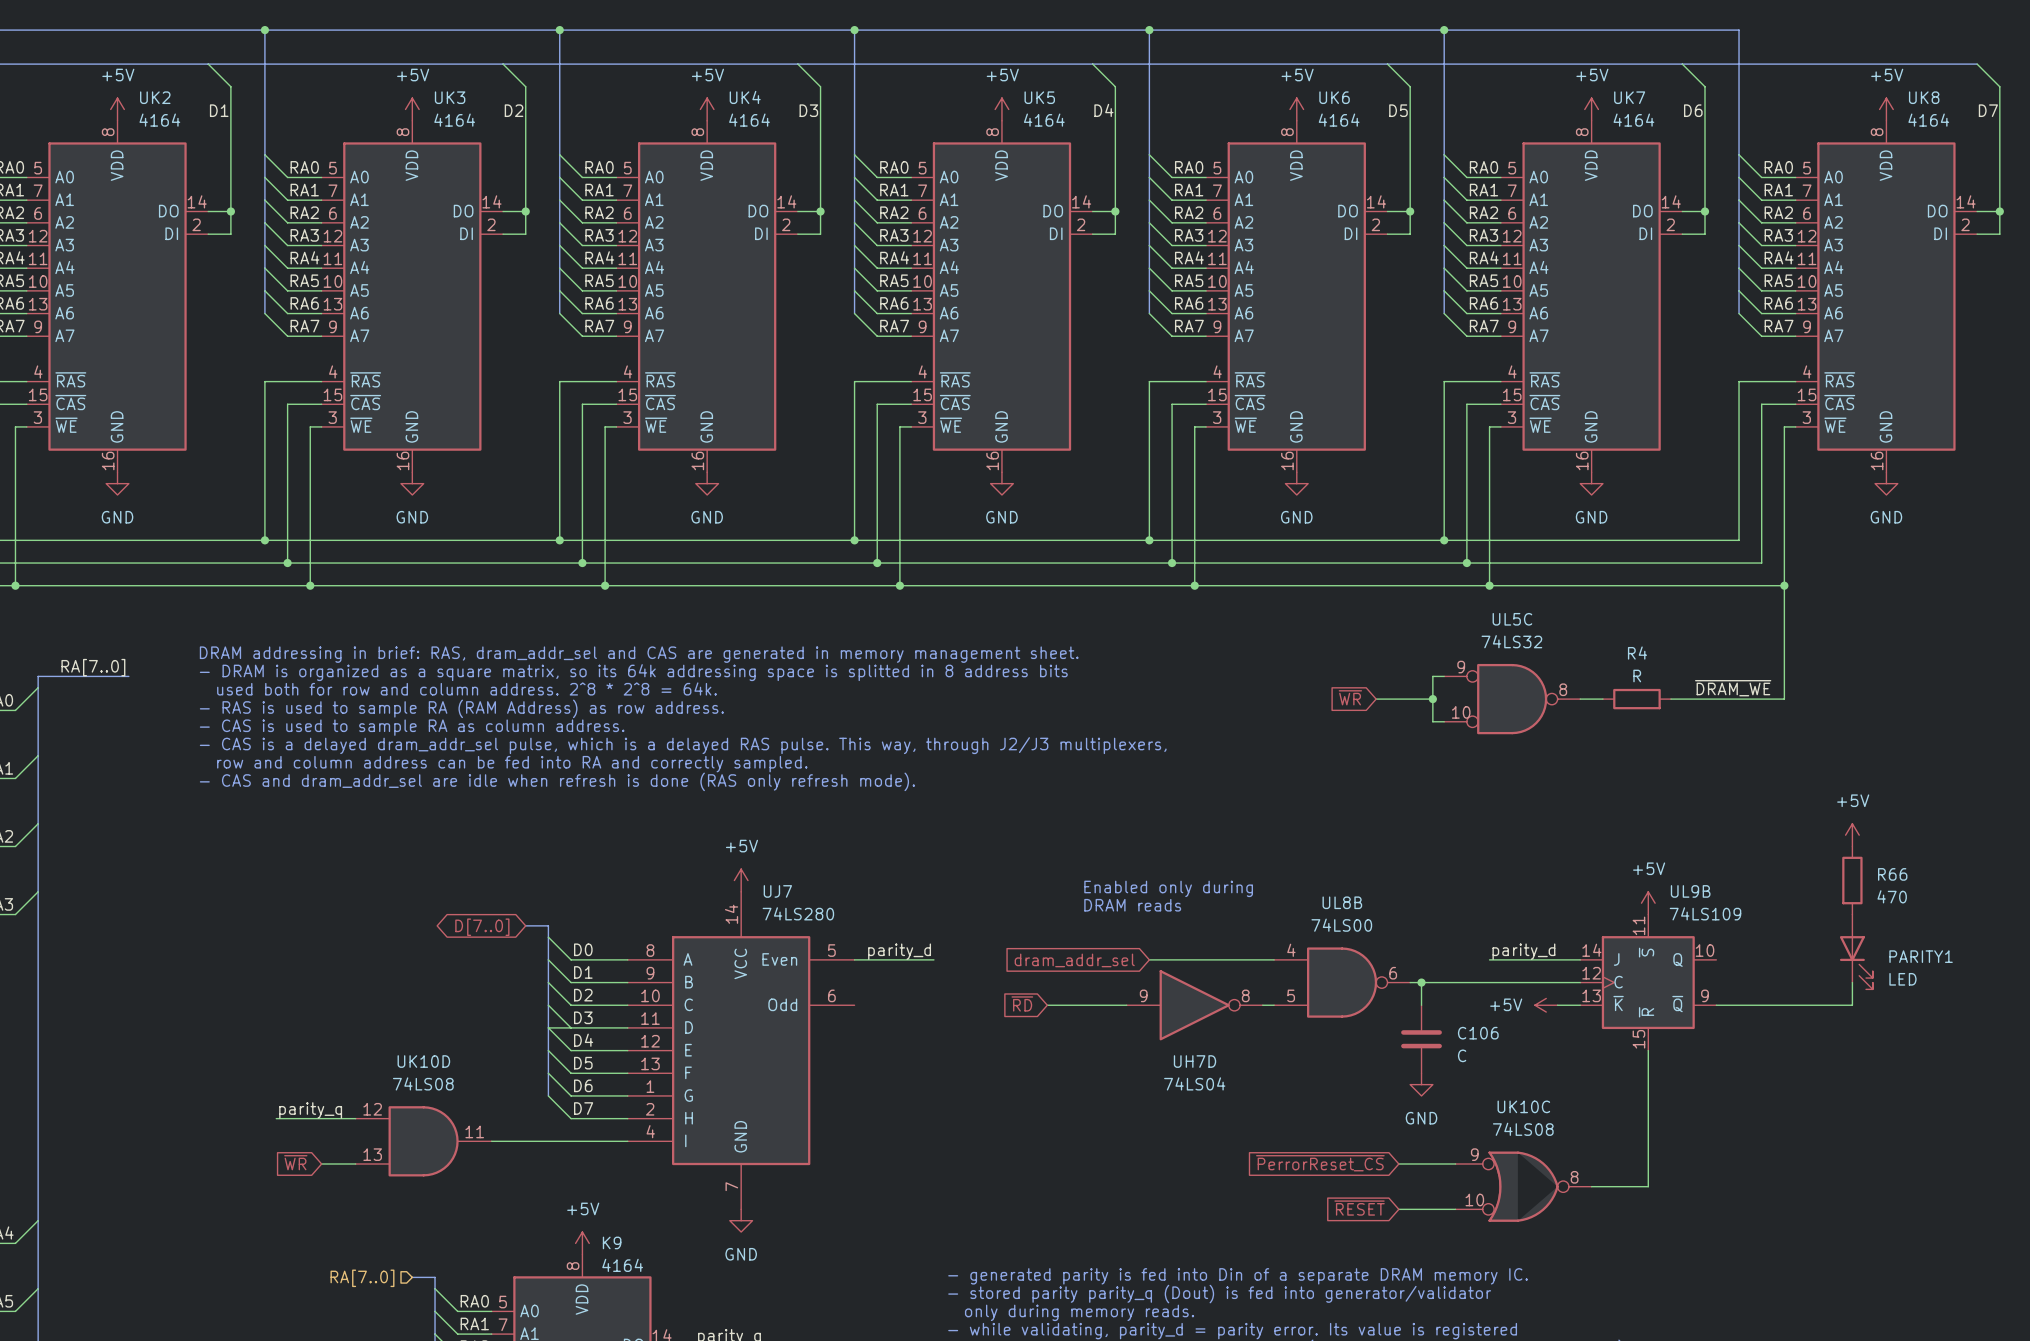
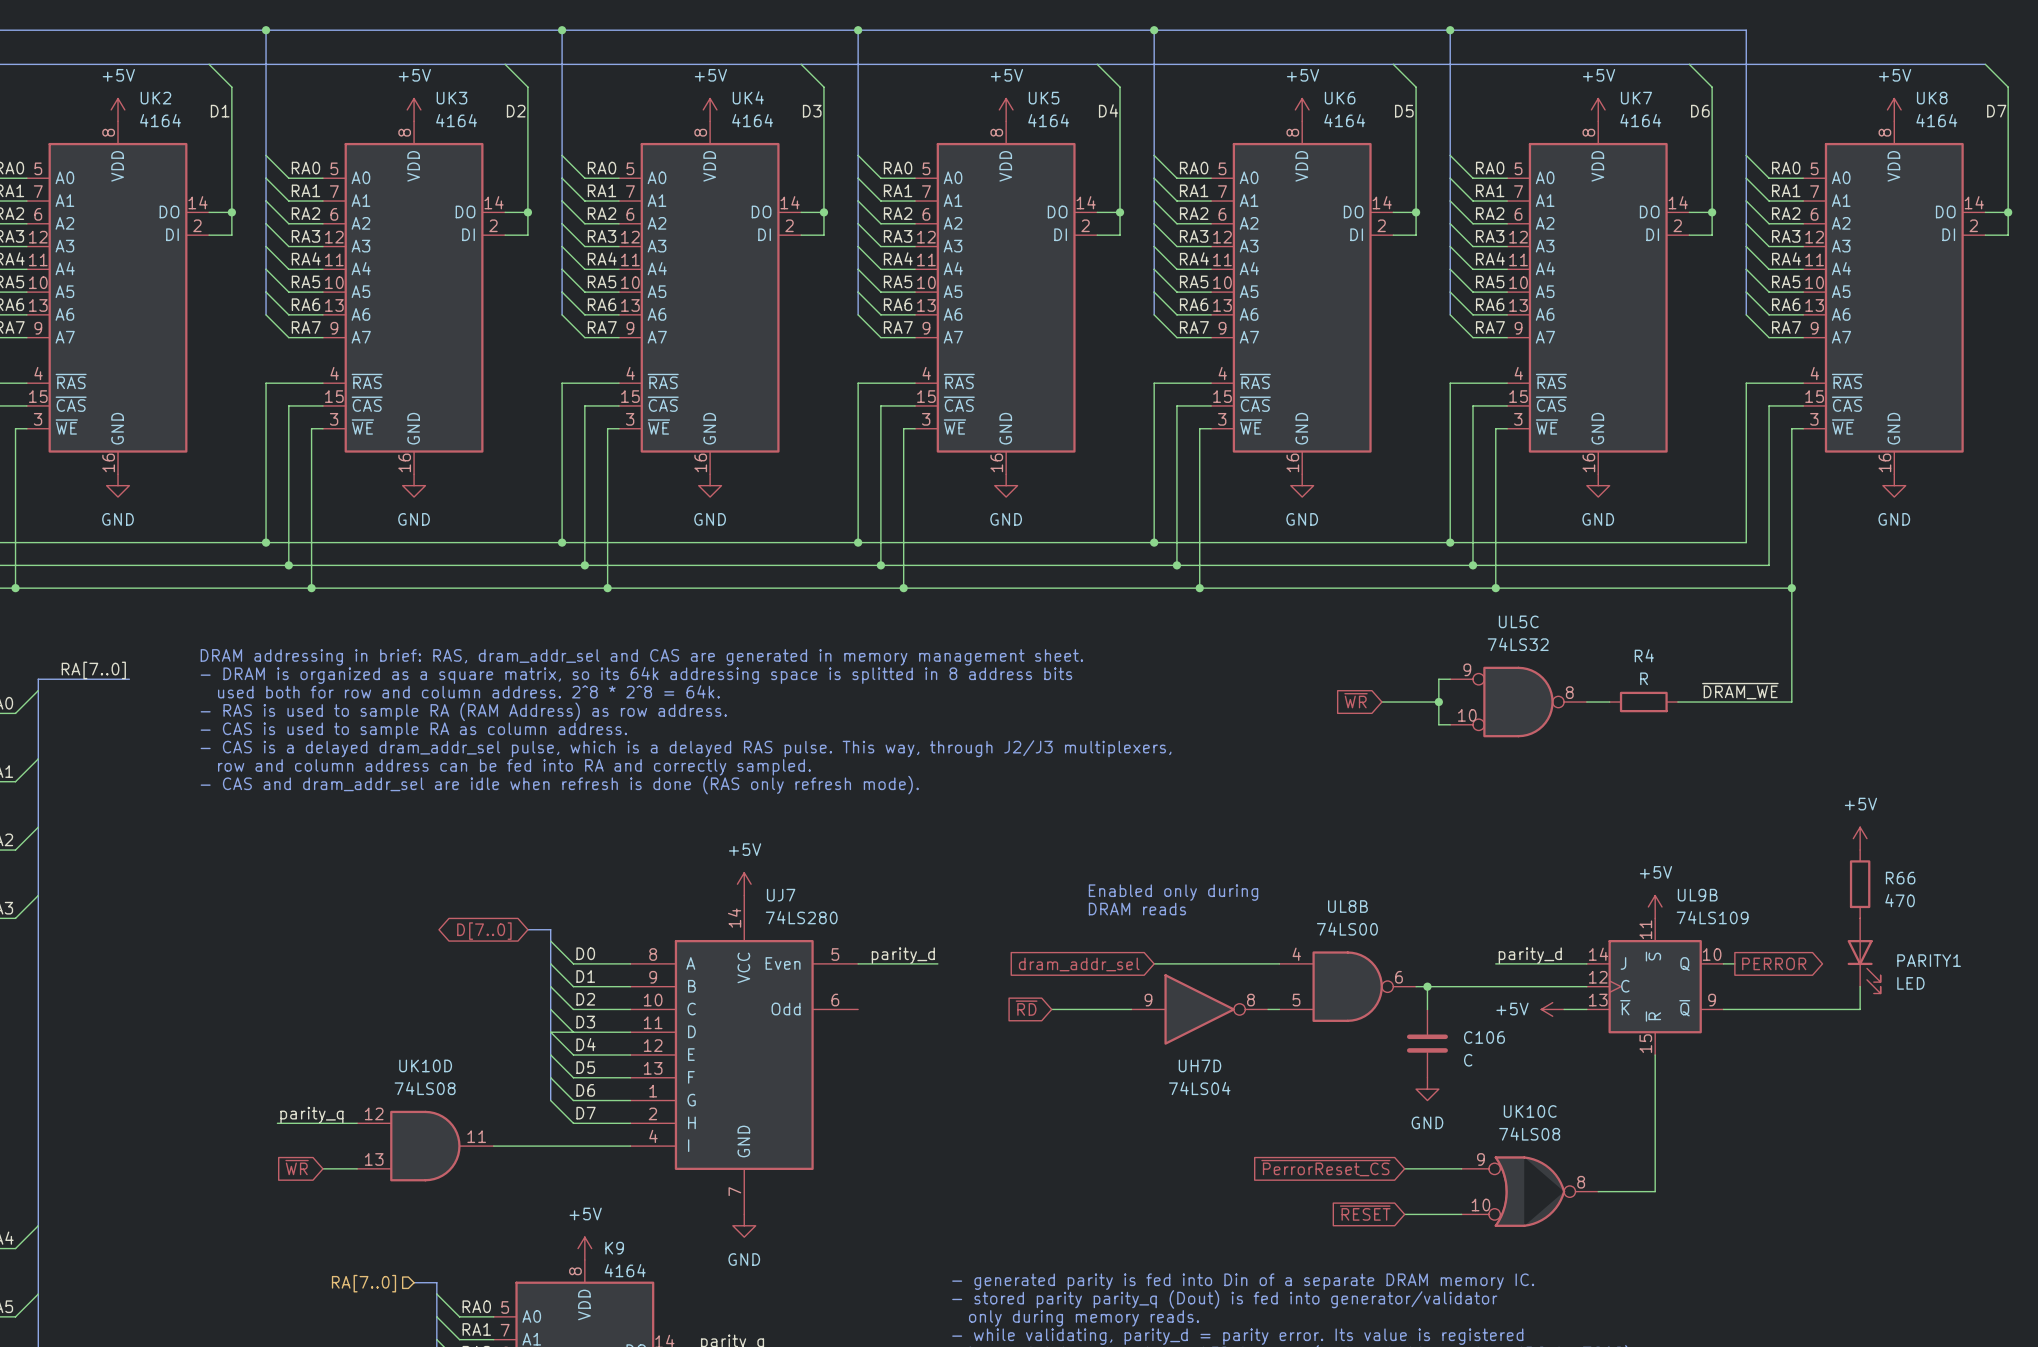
wire: none -> (1723, 963) (1734, 963)
global label: none -> PERROR (1774, 963)

